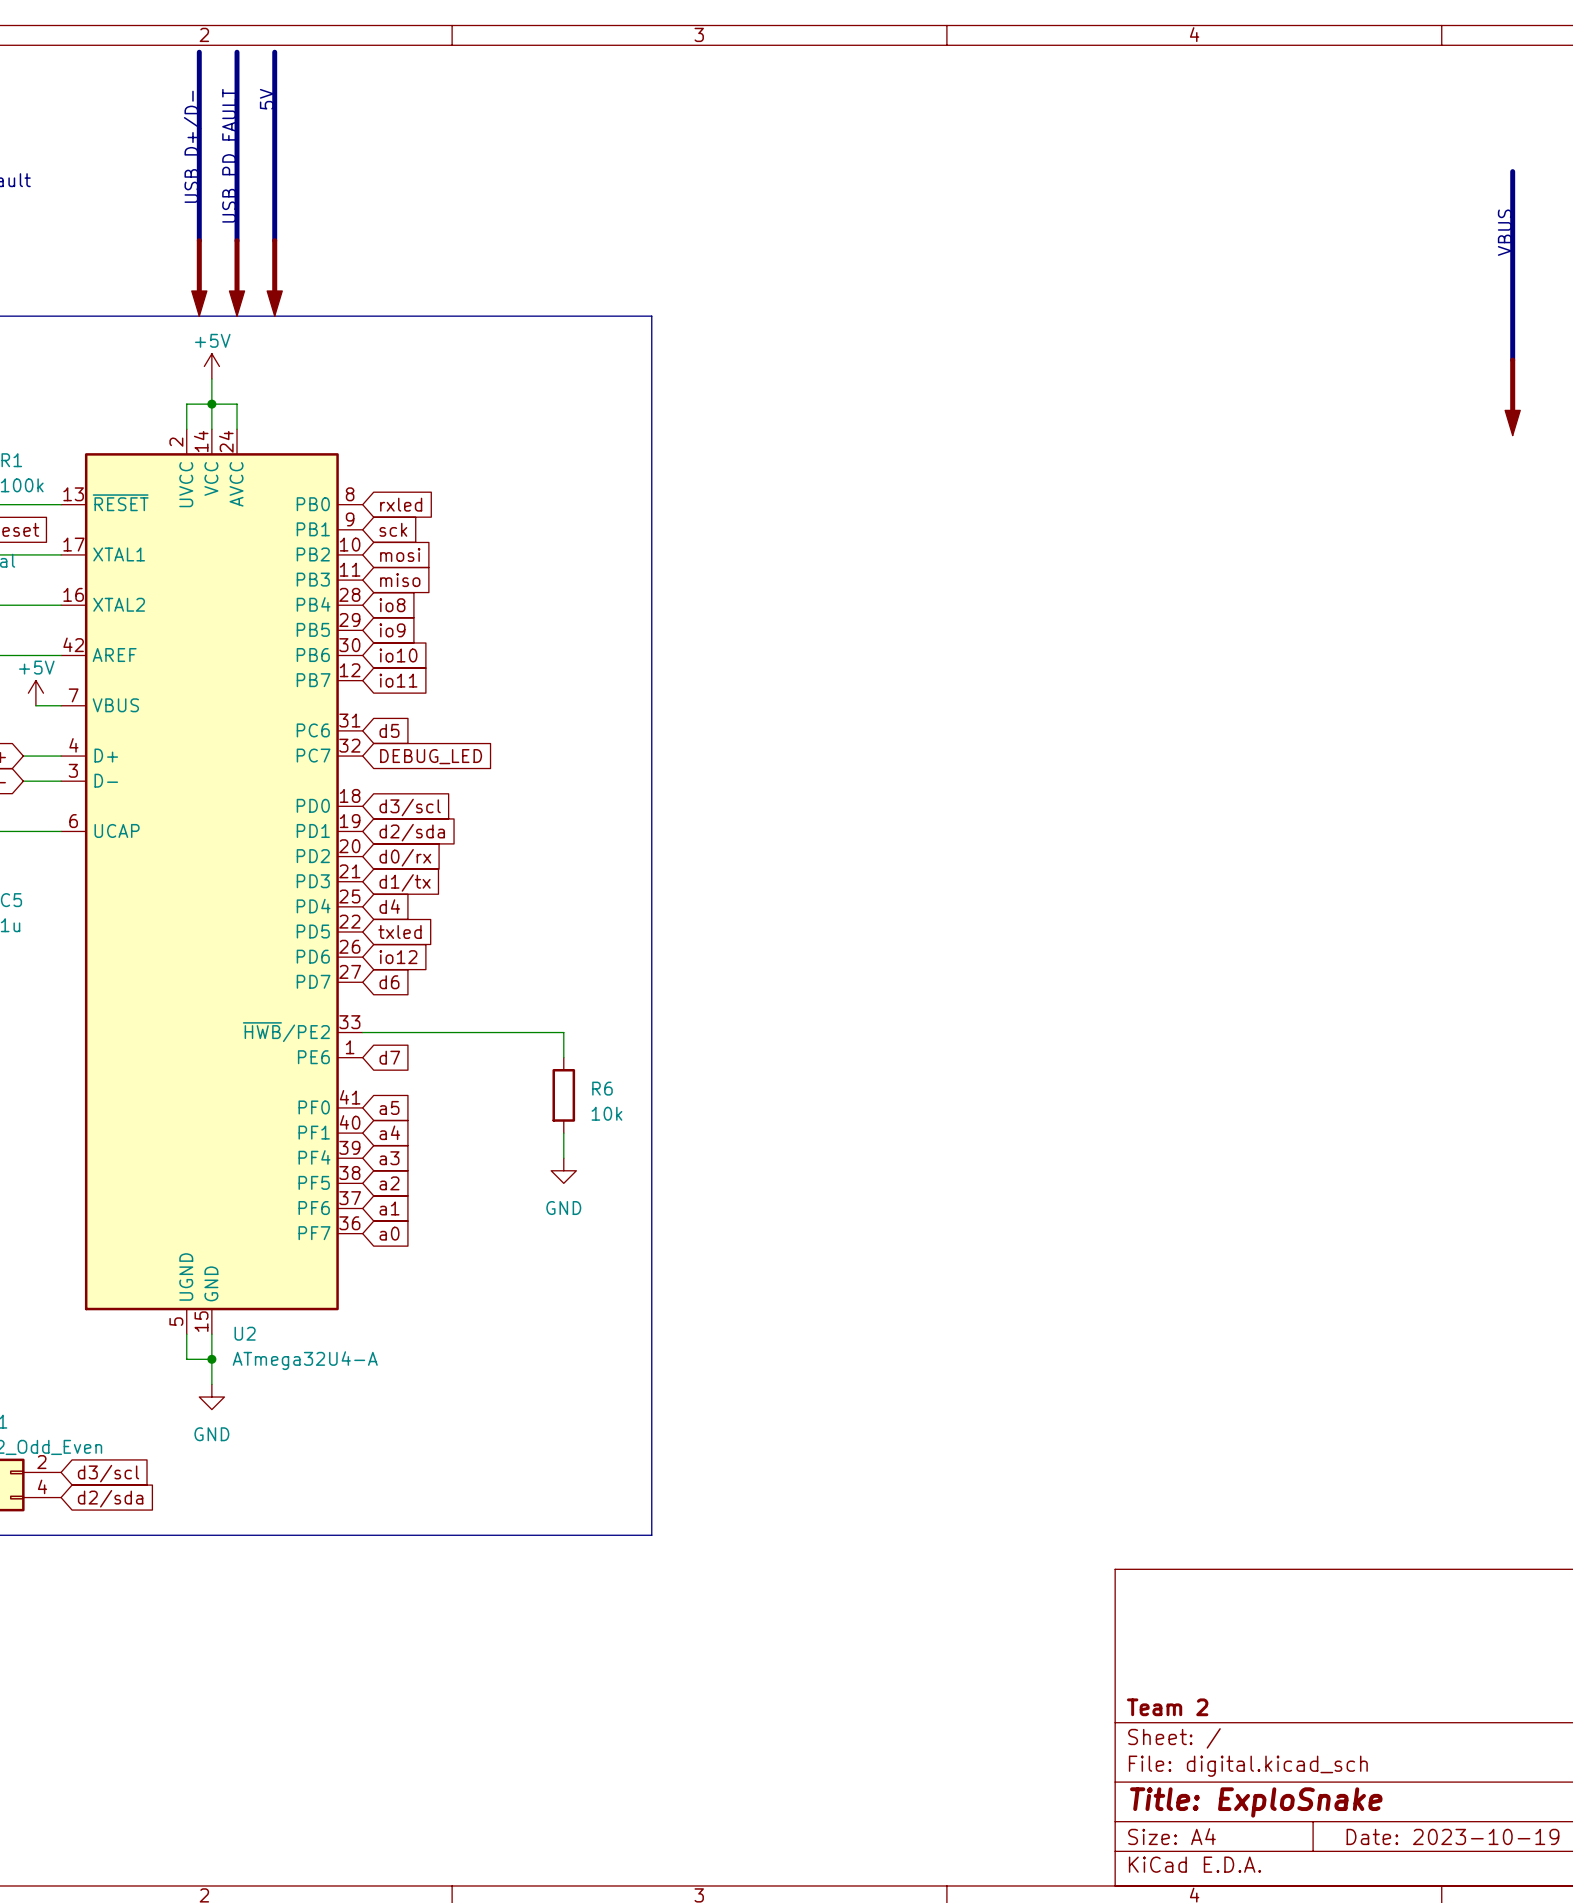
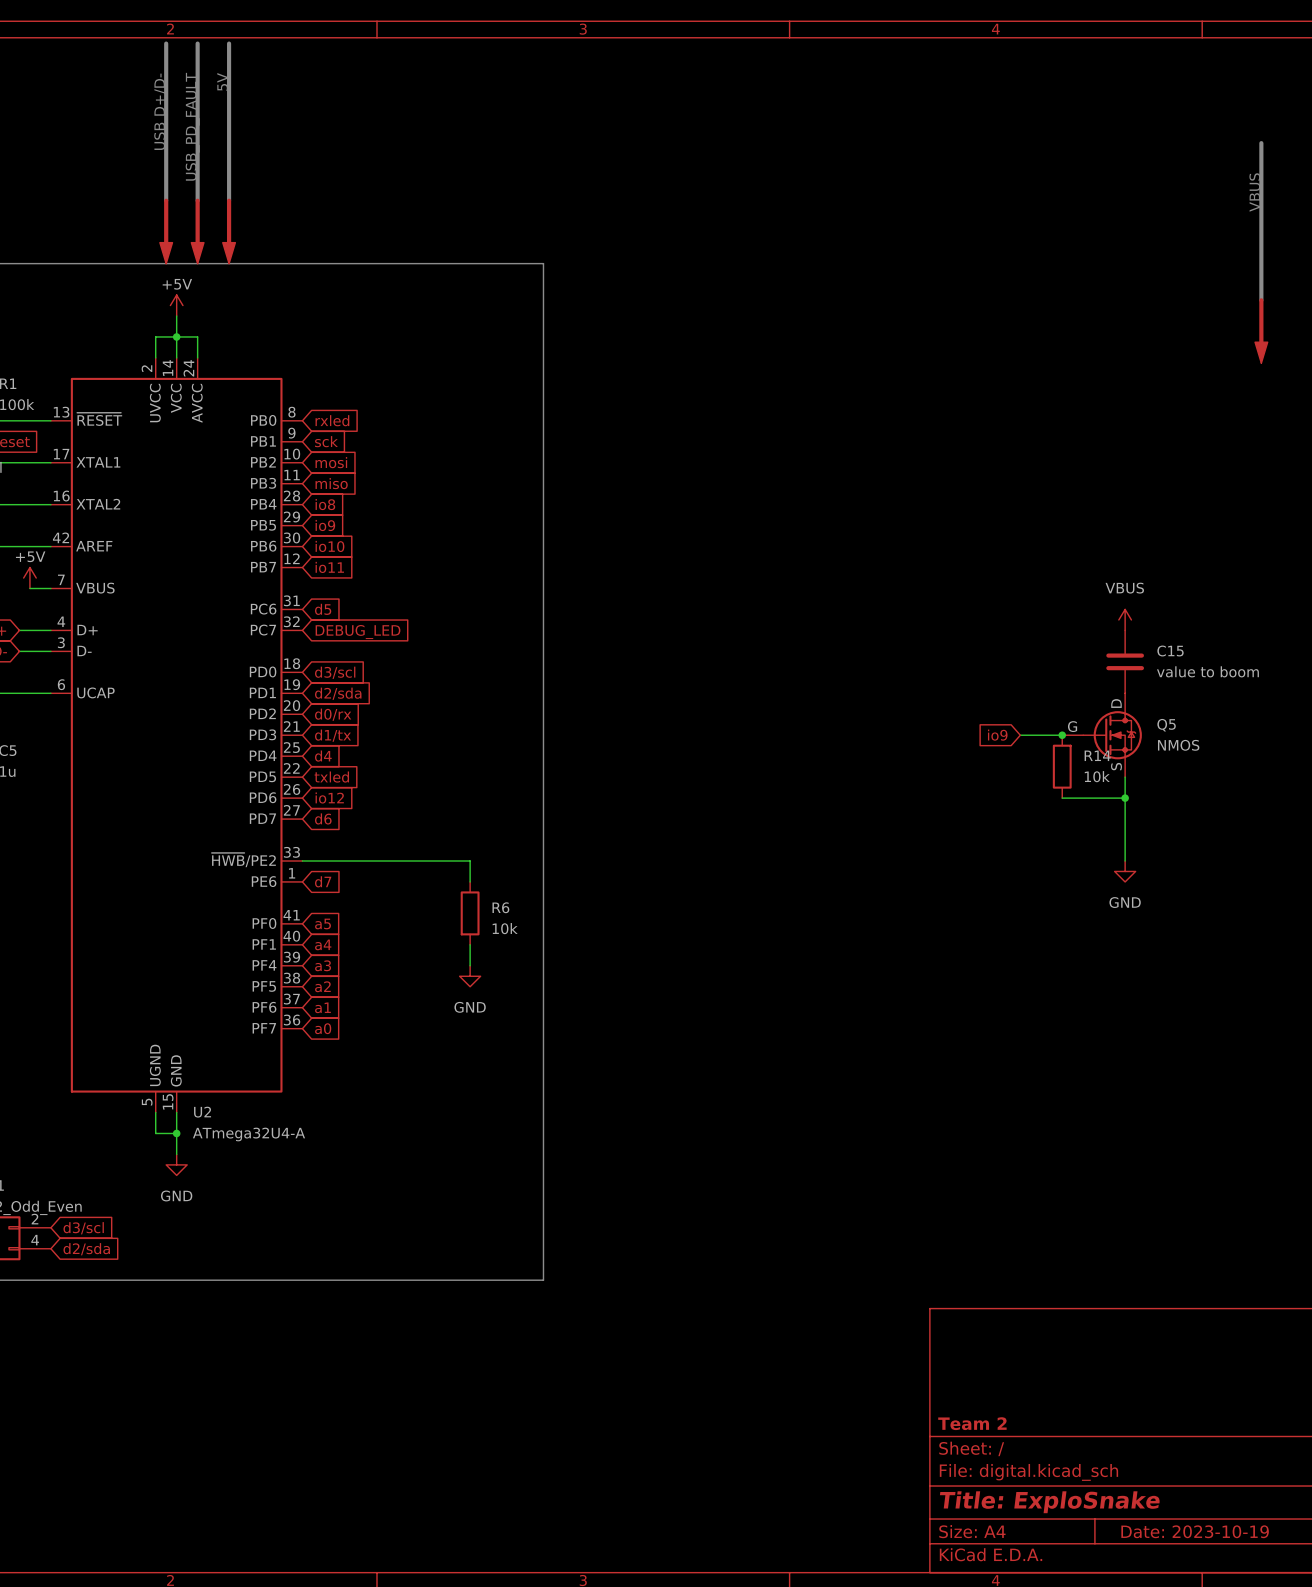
power symbol: none -> VBUS (1125, 619)
C15: none -> value to boom (1125, 661)
global label: none -> io9 (997, 735)
wire: none -> (1020, 735) (1062, 735)
junction: none -> (1062, 735)
Q5: none -> NMOS (1102, 735)
R14: none -> 10k (1062, 766)
wire: none -> (1125, 777) (1125, 860)
wire: none -> (1062, 798) (1125, 798)
junction: none -> (1125, 798)
power symbol: none -> GND (1125, 871)

